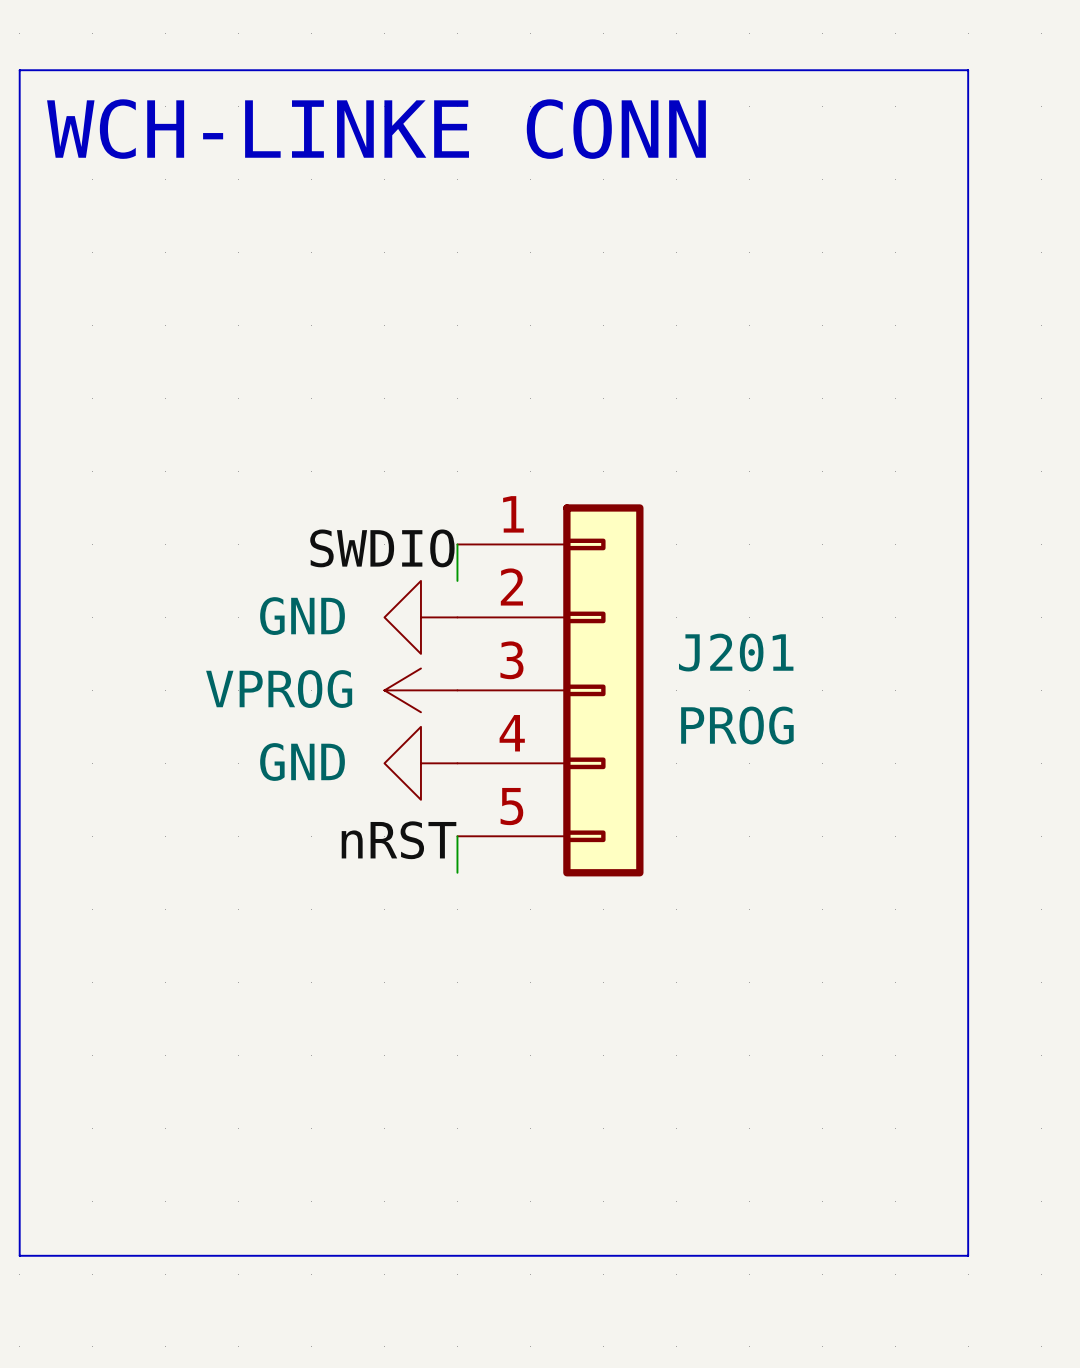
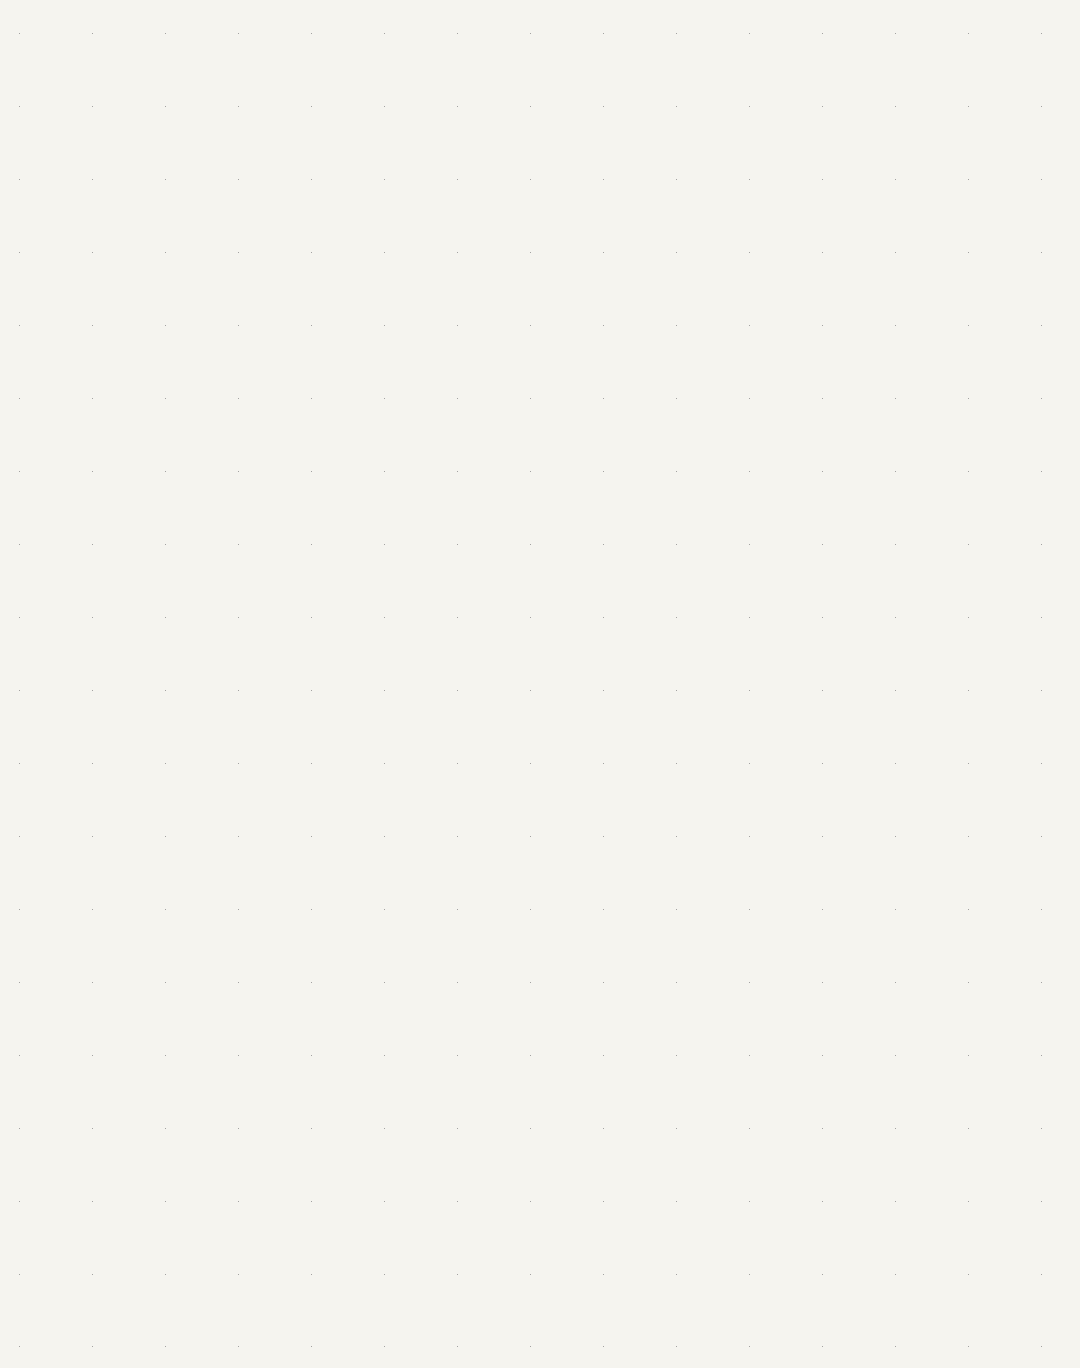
line: (19, 70) (968, 70) (968, 1255) (19, 1255) (19, 70) -> none
text: WCH-LINKE CONN (376, 129) -> none
wire: (457, 544) (457, 580) -> none
label: SWDIO (382, 548) -> none
power symbol: GND (420, 617) -> none
power symbol: VPROG (420, 690) -> none
J201: PROG (550, 690) -> none
power symbol: GND (420, 763) -> none
wire: (457, 836) (457, 872) -> none
label: nRST (399, 840) -> none

